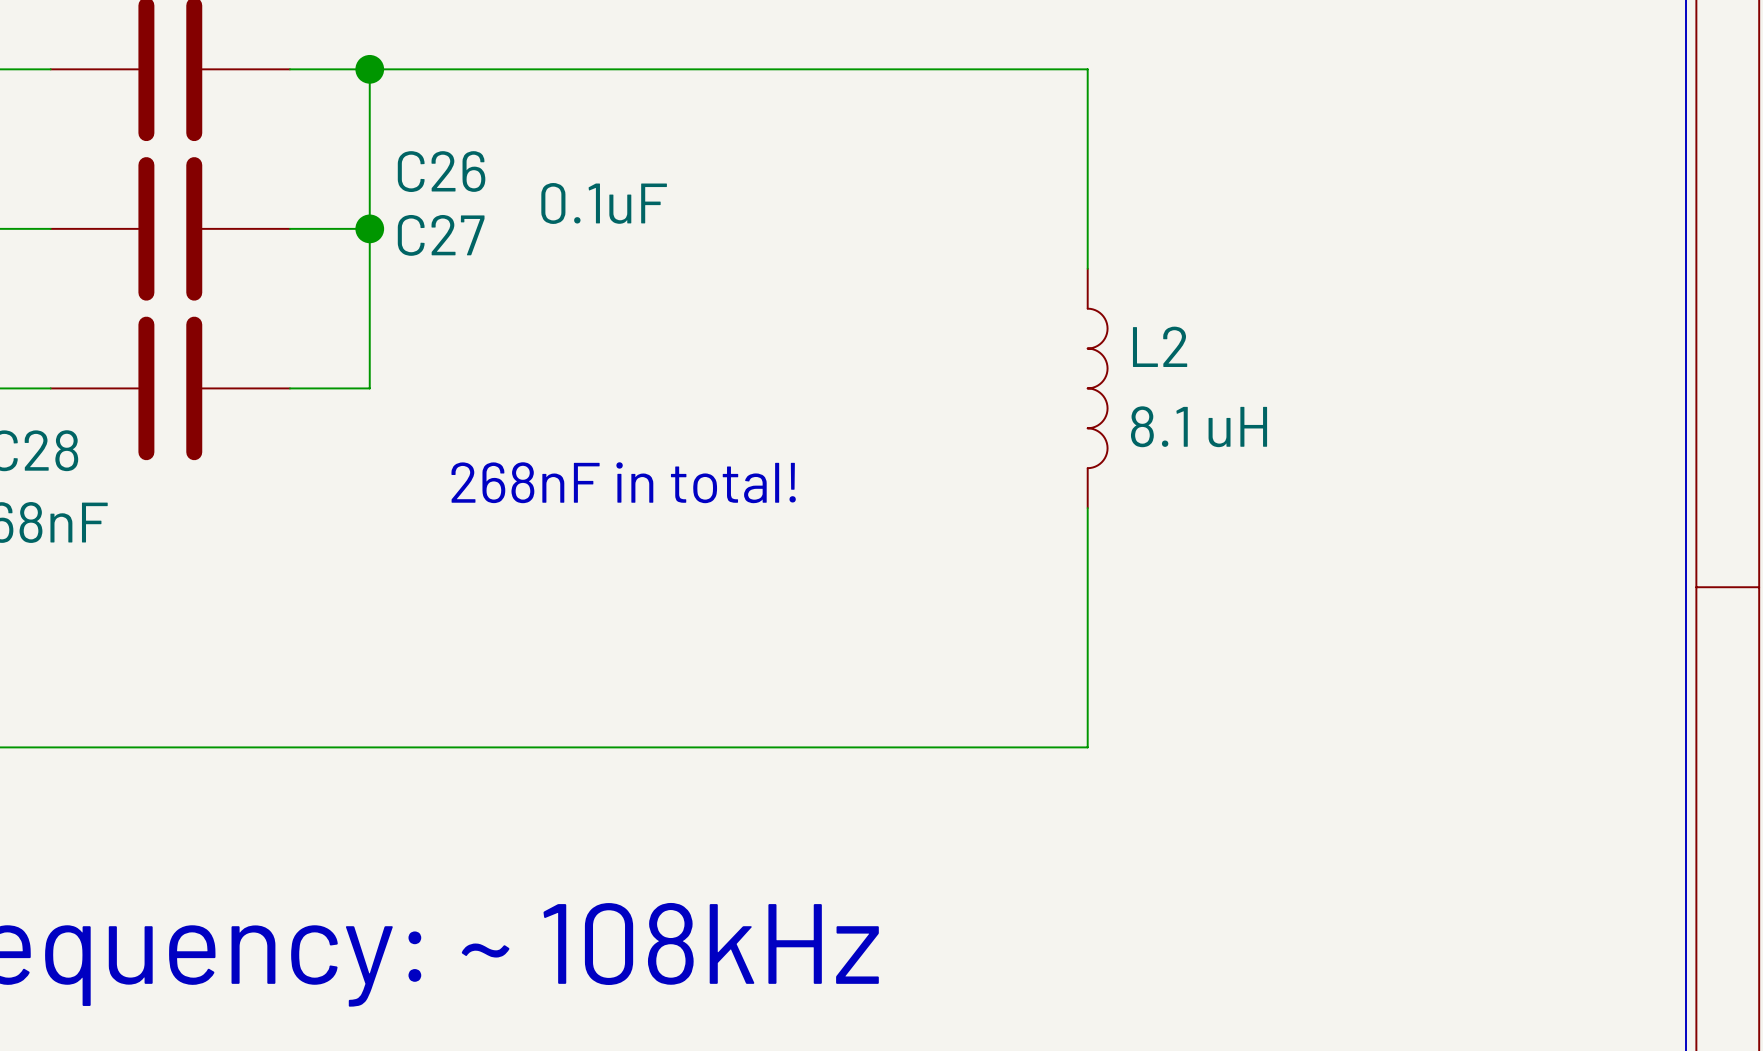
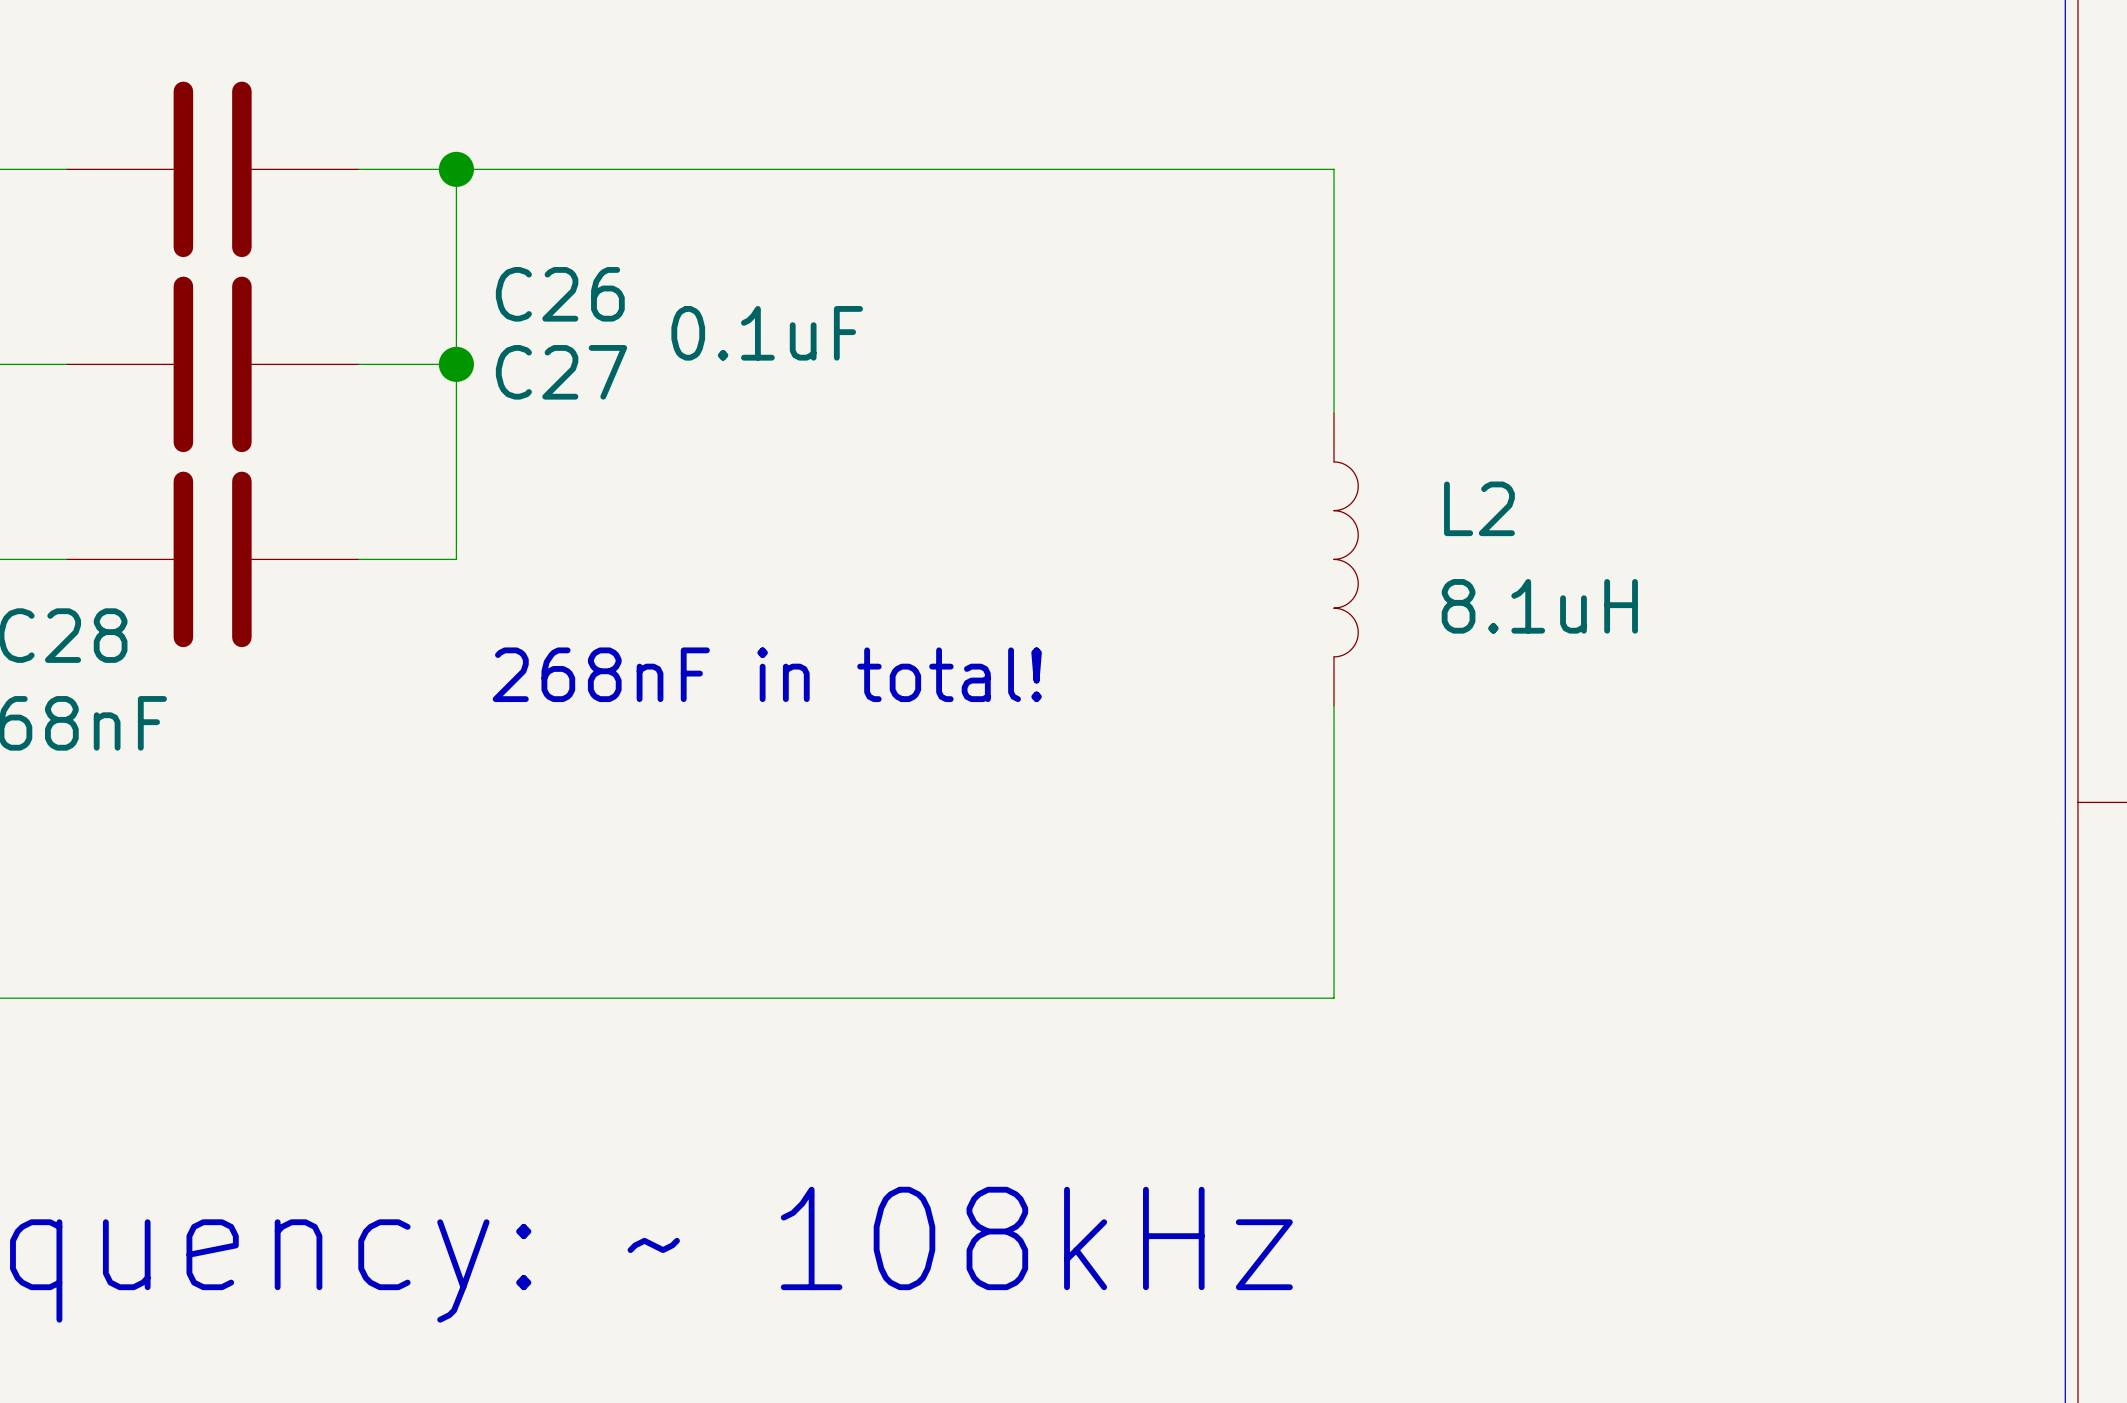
L2 name position: L2 (1160, 346) -> L2 (1479, 508)
L2 value: 8.1 uH (1199, 426) -> 8.1uH (1539, 606)

